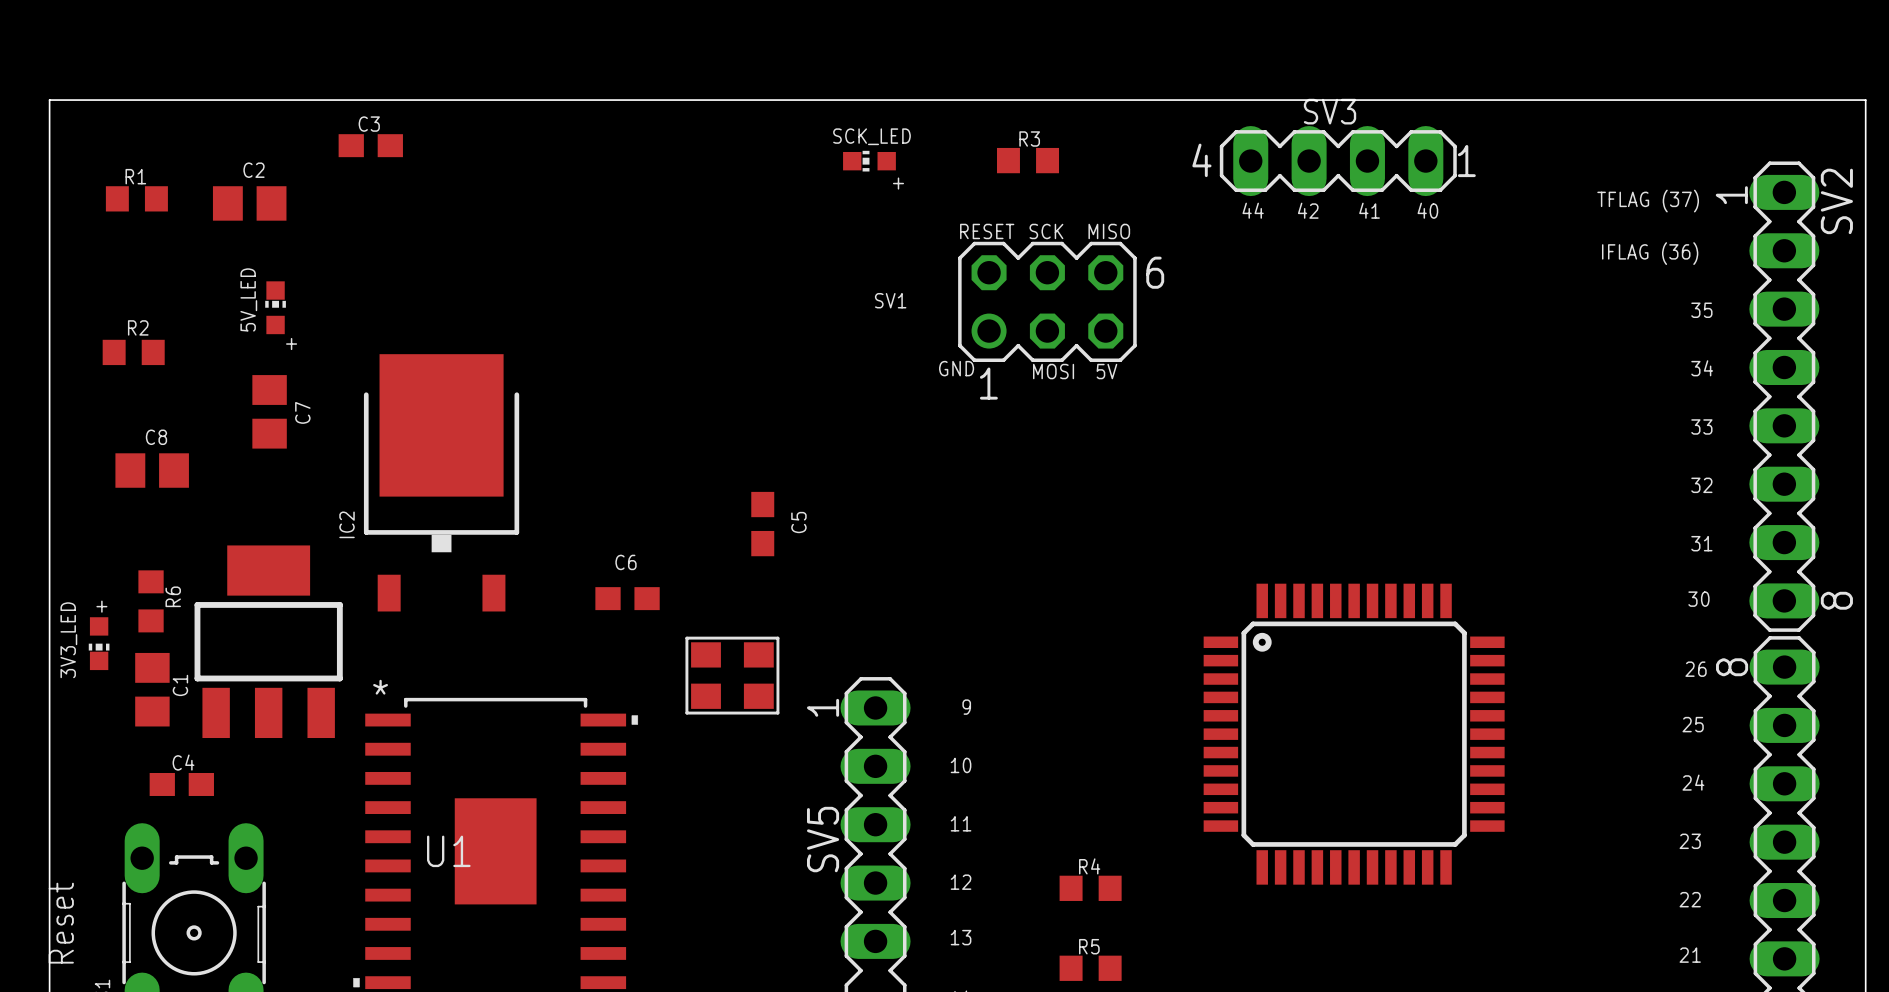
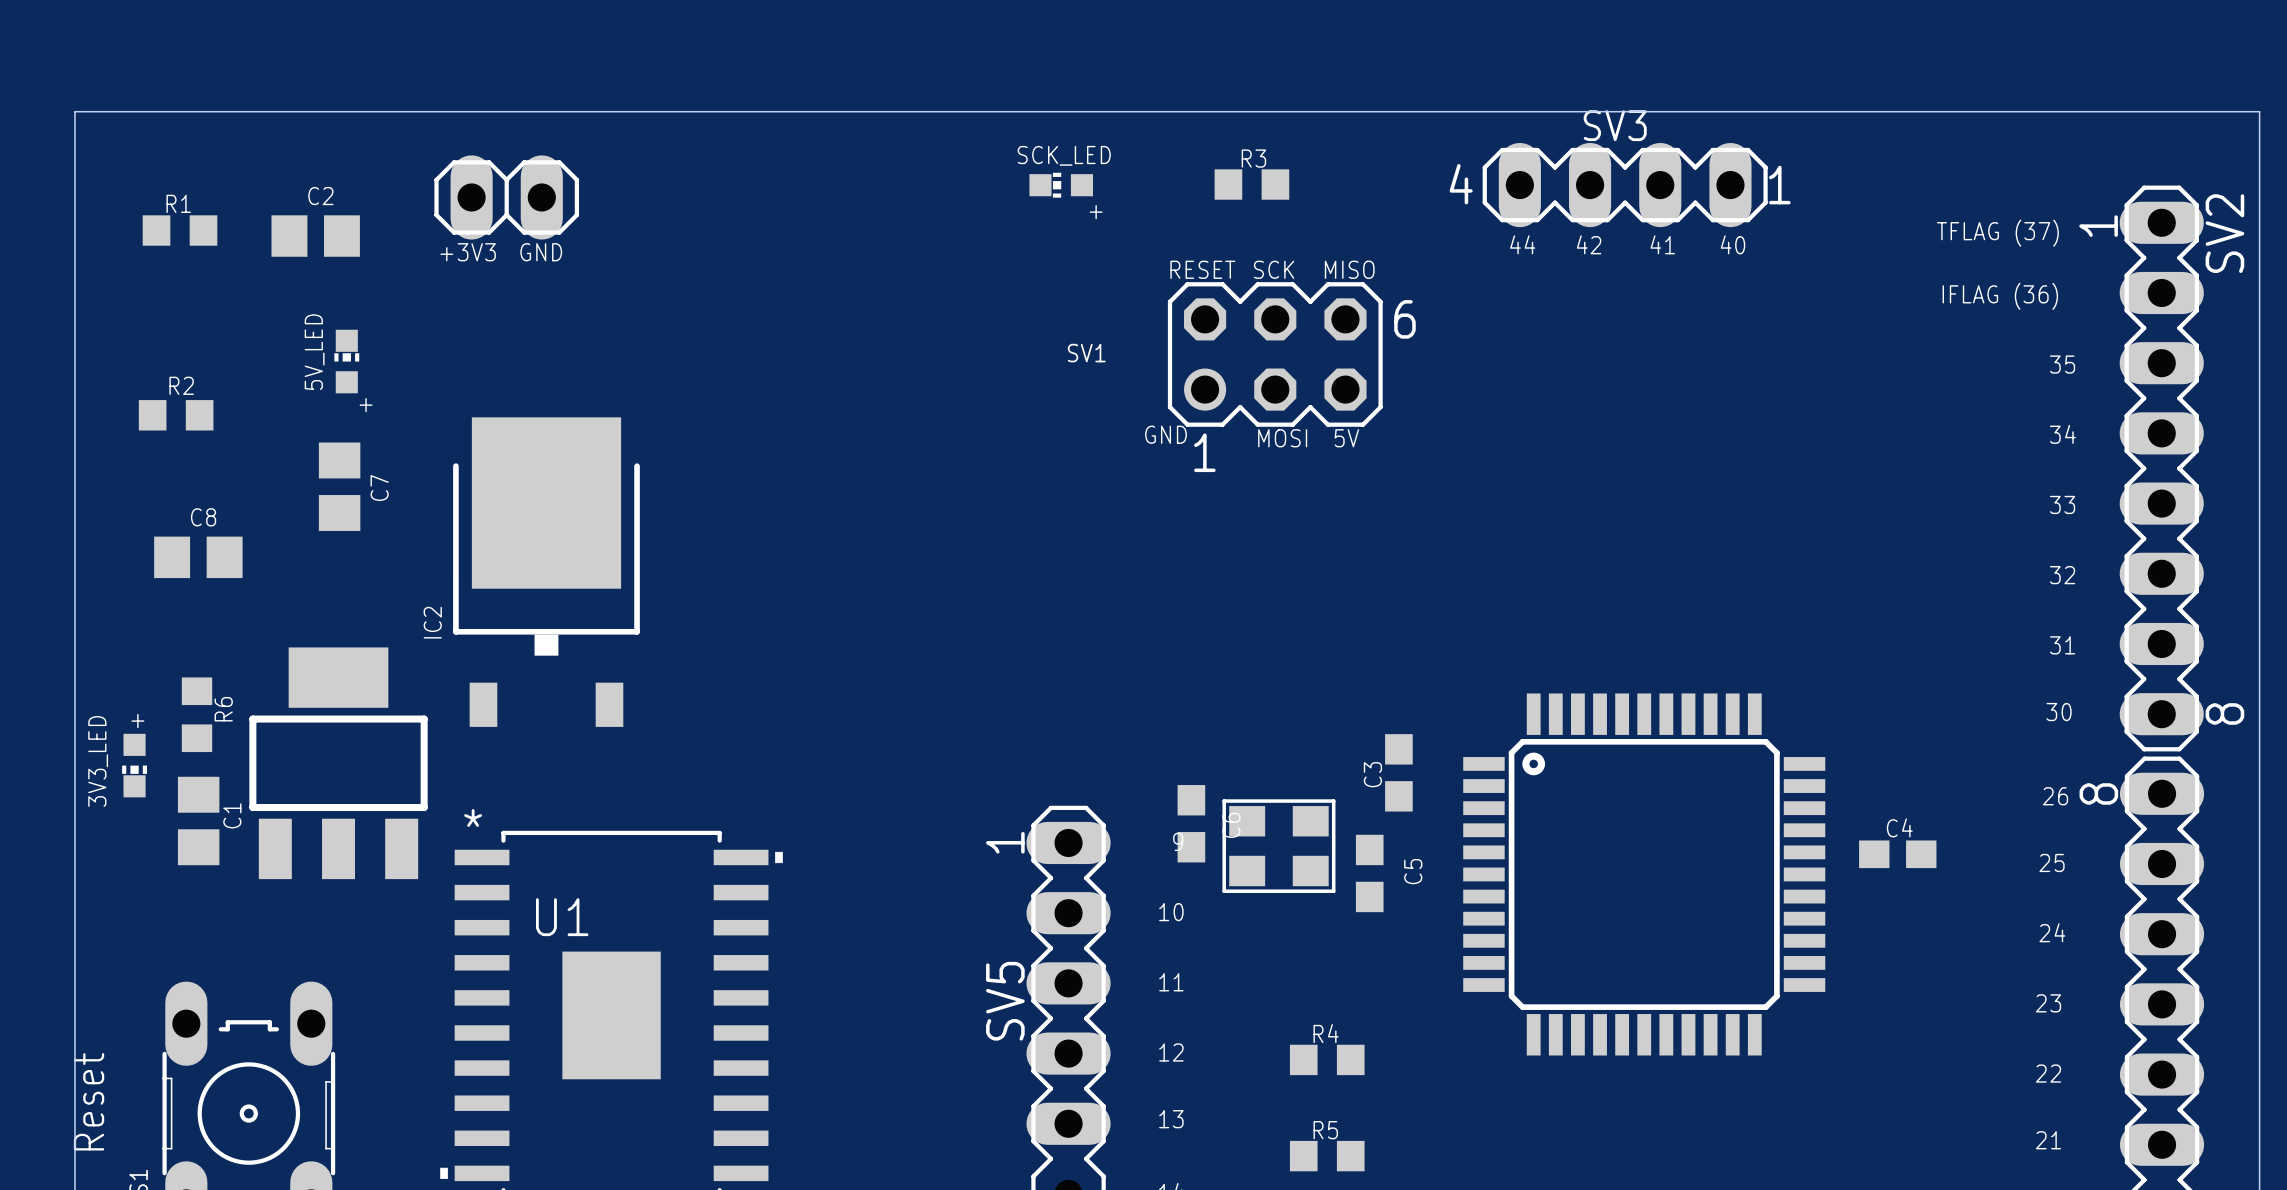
C3 rotation: 0° (370, 145) -> 90° clockwise (1398, 772)
C3 position: (370, 145) -> (1398, 772)
part: none -> (506, 197)
text: none -> +3V3 (468, 252)
text: none -> GND (541, 252)
C5 position: (762, 524) -> (1369, 873)
C6 rotation: 0° (627, 598) -> 90° clockwise (1191, 823)
C6 position: (627, 598) -> (1191, 823)
part position: (732, 675) -> (1278, 846)
C4 position: (181, 784) -> (1897, 854)
U1 name position: U1 (448, 851) -> U1 (562, 917)

